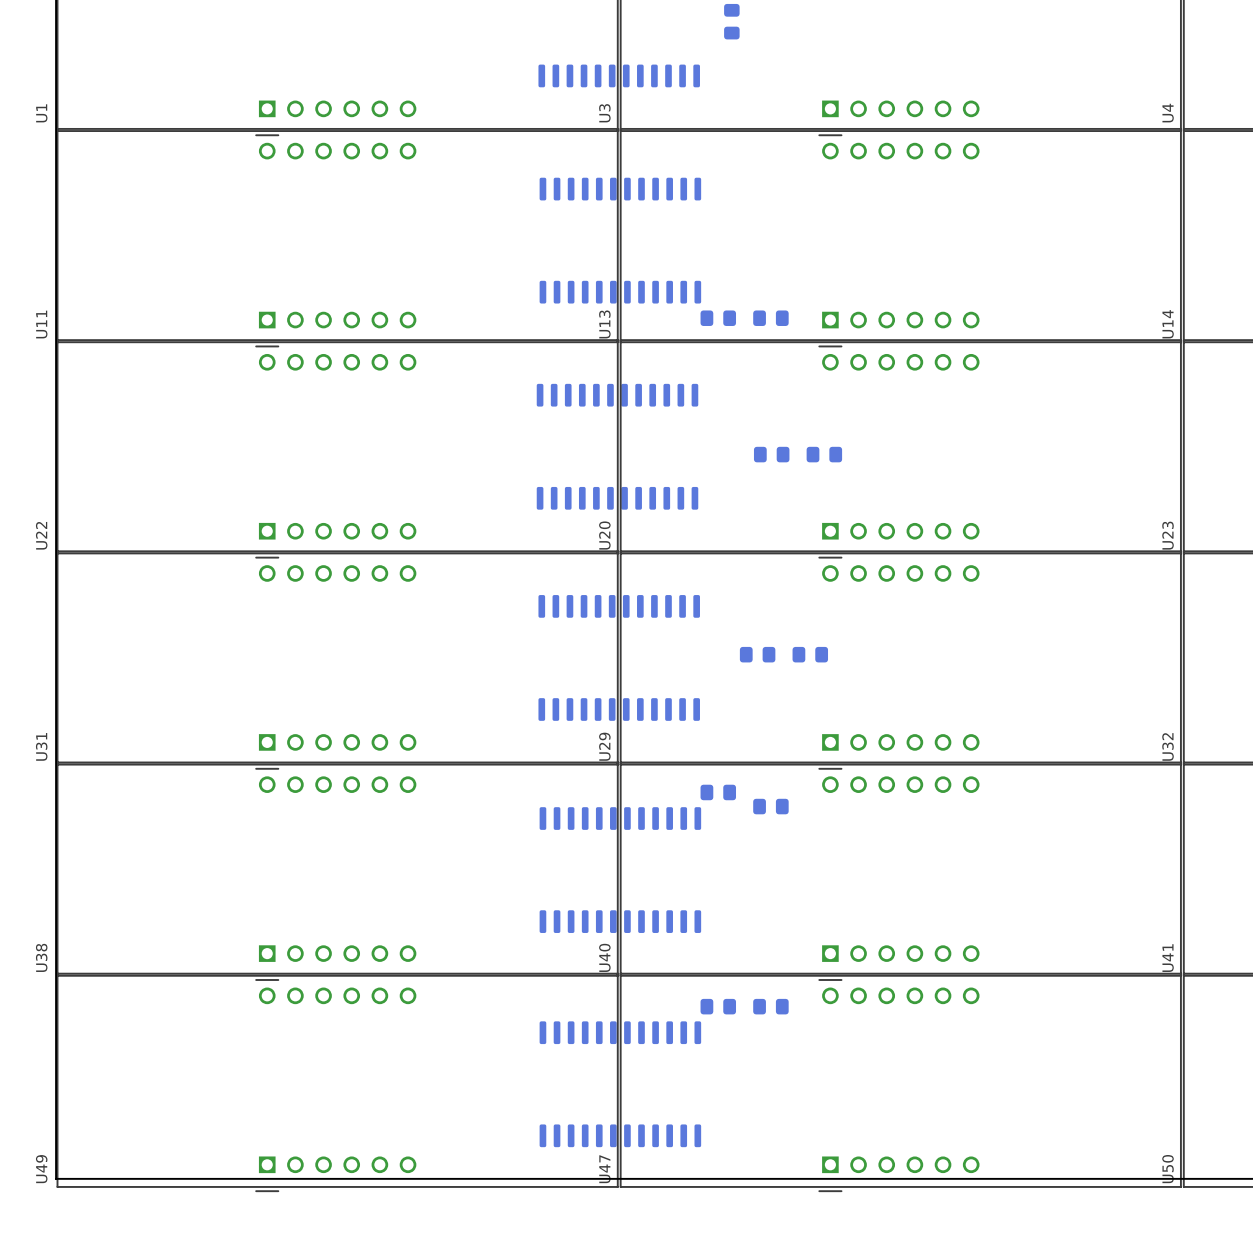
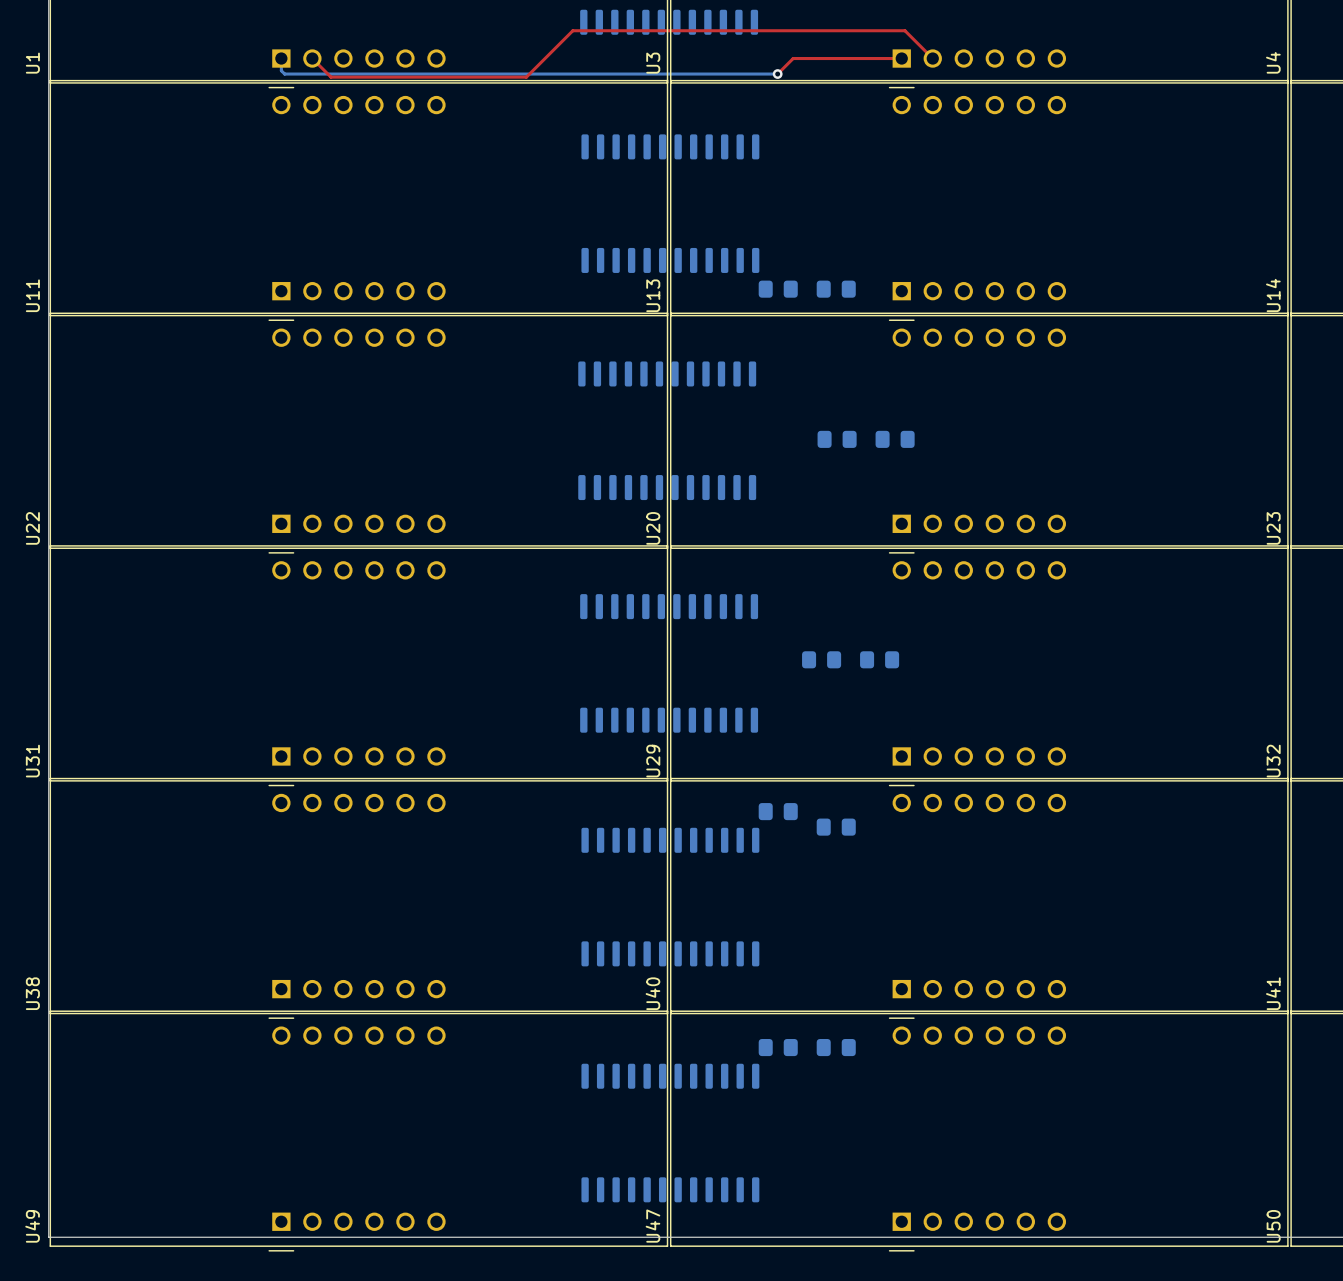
bottom track: none -> (281, 58) (281, 70) (284, 74) (777, 74)
top track: none -> (312, 58) (331, 77) (526, 77) (572, 30) (904, 30) (932, 58)
top track: none -> (901, 58) (793, 58) (777, 74)
via: none -> (777, 74)

